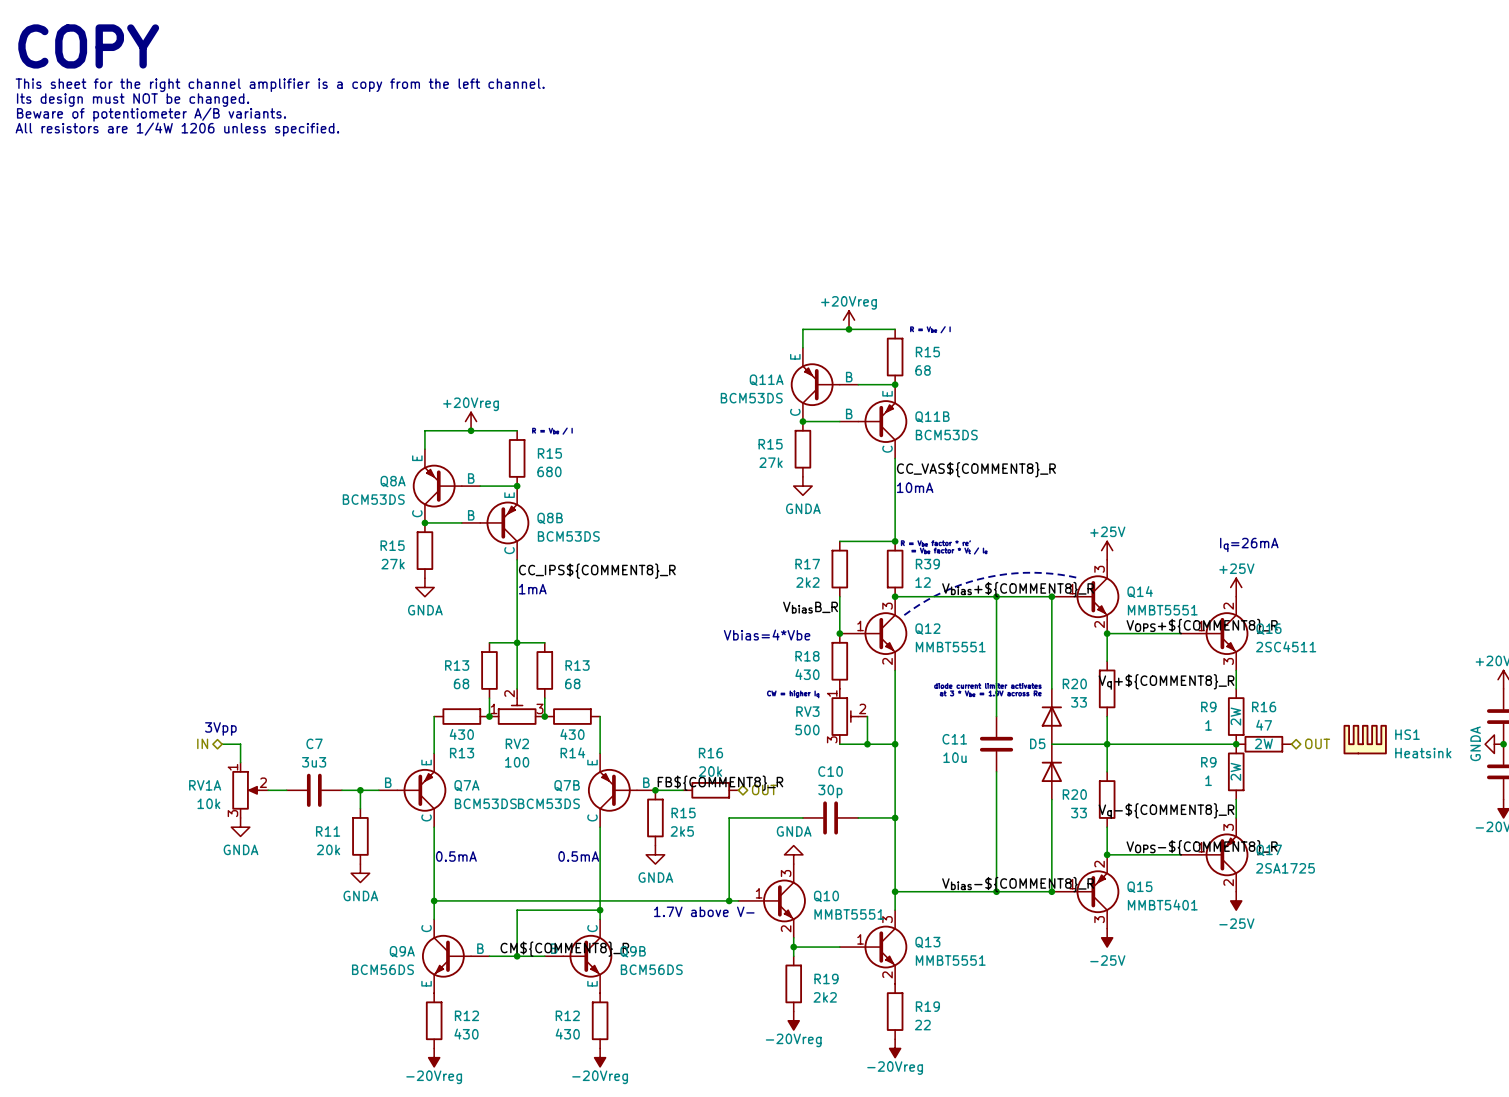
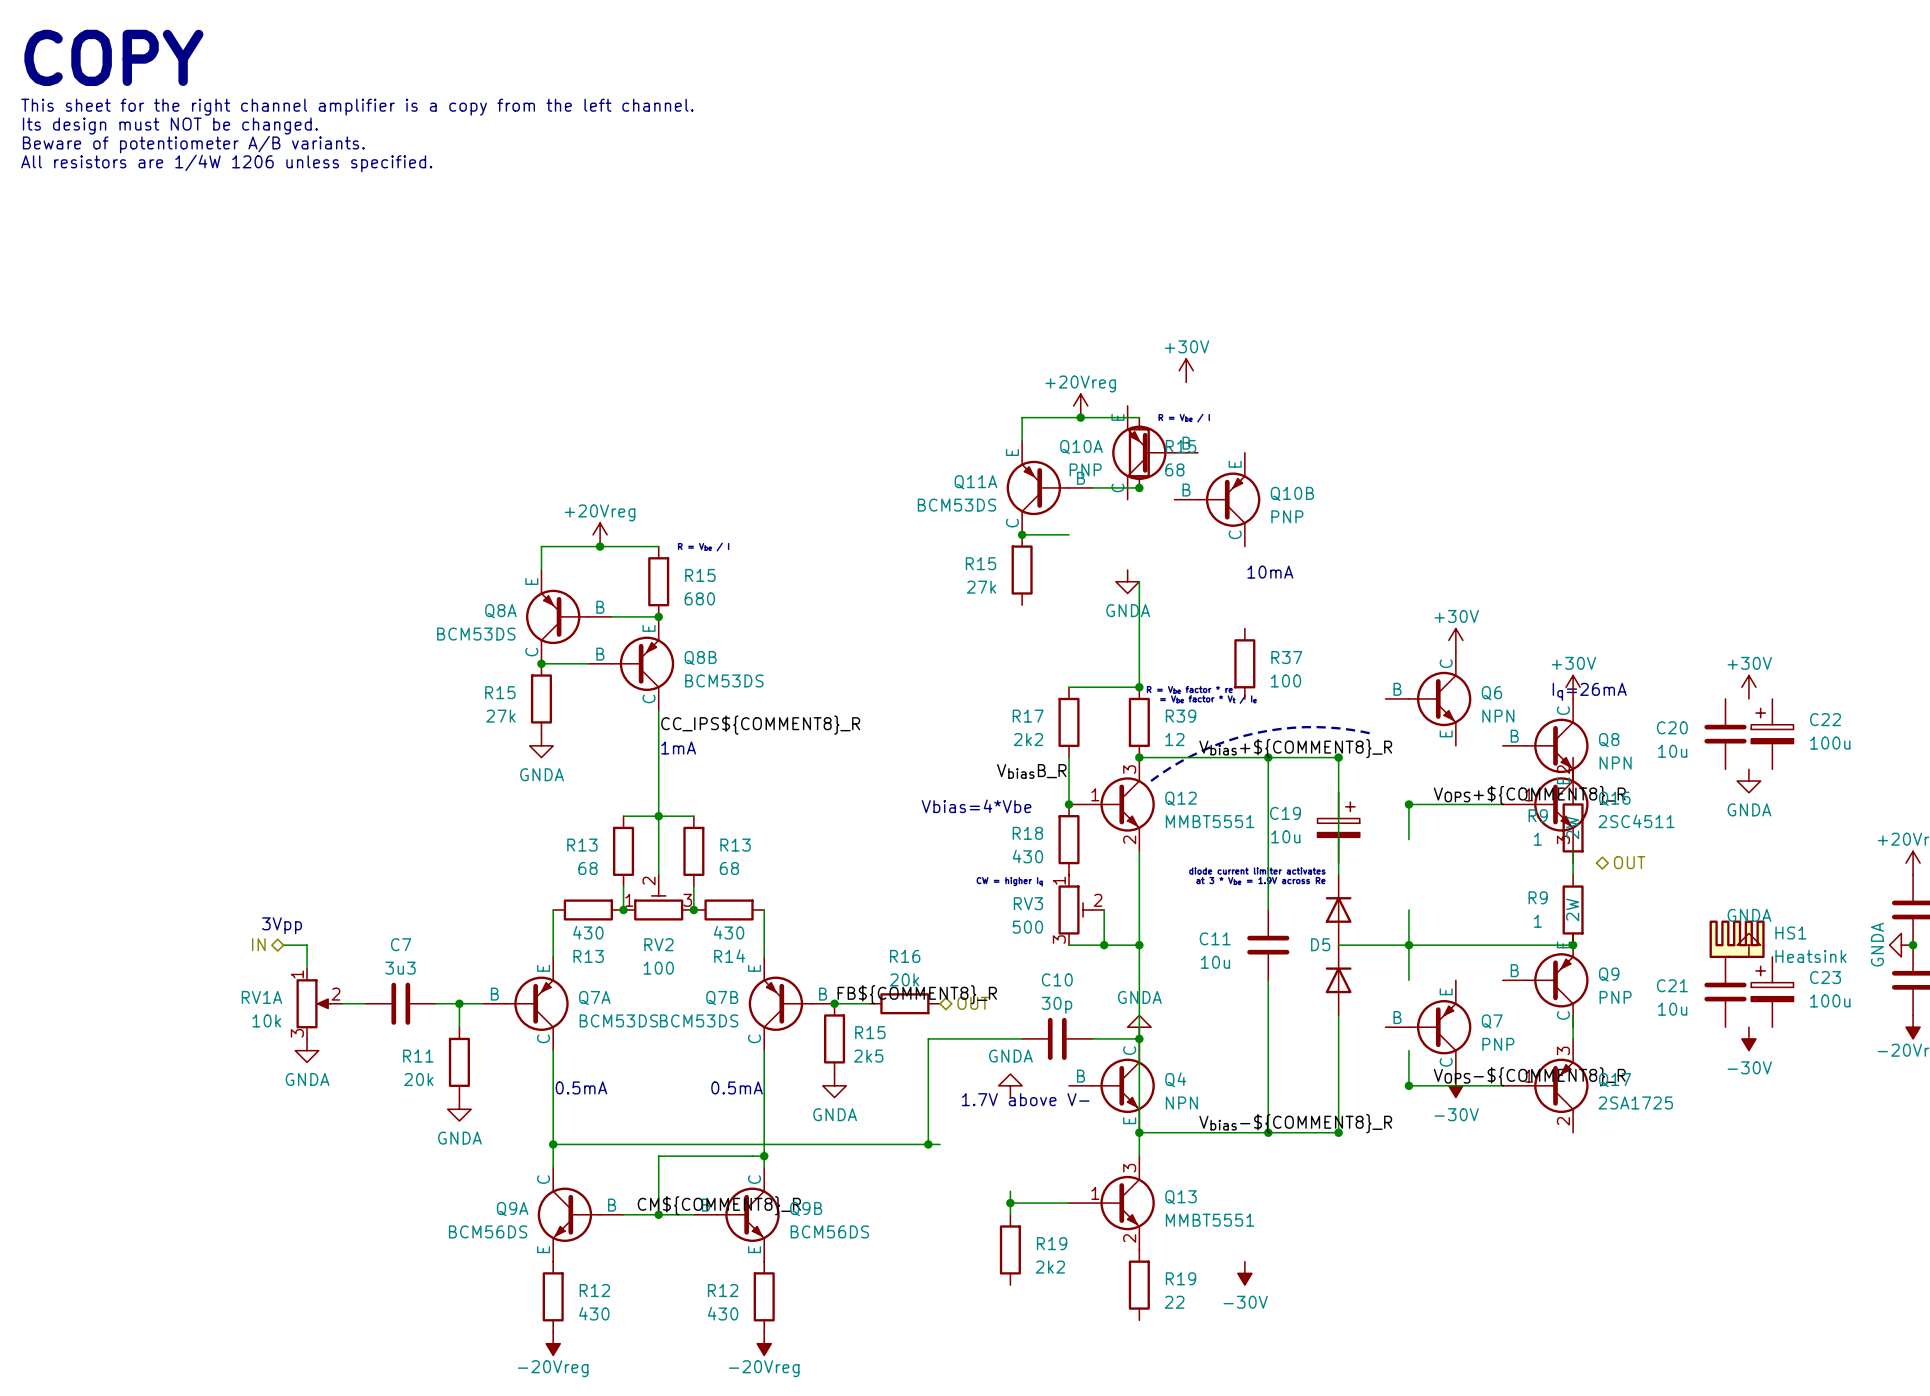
power symbol: none -> +30V (1186, 370)
Q10A: none -> PNP (1155, 452)
Q10B: none -> PNP (1217, 499)
Q11B: BCM53DS (873, 421) -> none
label: CC_VAS${COMMENT8}_R (976, 469) -> none
power symbol position: GNDA (802, 486) -> GNDA (1127, 581)
text position: 10mA (915, 487) -> 10mA (1270, 572)
power symbol: none -> +30V (1455, 640)
R37: none -> 100 (1244, 663)
power symbol: none -> +30V (1573, 687)
power symbol: none -> +30V (1748, 687)
power symbol: +25V (1107, 550) -> none
Q6: none -> NPN (1428, 698)
C20: none -> 10u (1725, 734)
C22: none -> 100u (1772, 734)
Q8: none -> NPN (1545, 745)
power symbol: +25V (1236, 587) -> none
Q14: MMBT5551 (1085, 596) -> none
power symbol: none -> GNDA (1748, 781)
C19: none -> 10u (1338, 827)
label: Vq+${COMMENT8}_R (1166, 681) -> none
R20: 33 (1107, 688) -> none
hierarchical label position: OUT (1317, 743) -> OUT (1629, 862)
R16: 47 (1263, 744) -> none
power symbol: none -> GNDA (1748, 945)
Q9: none -> PNP (1545, 980)
R9 position: (1236, 771) -> (1573, 827)
C21: none -> 10u (1725, 992)
C23: none -> 100u (1772, 992)
R20: 33 (1107, 799) -> none
power symbol: none -> GNDA (1139, 1027)
Q7: none -> PNP (1428, 1027)
label: Vq-${COMMENT8}_R (1166, 811) -> none
power symbol: none -> -30V (1748, 1038)
Q4: none -> NPN (1111, 1085)
power symbol: none -> -30V (1455, 1085)
Q15: MMBT5401 (1085, 891) -> none
Q10: MMBT5551 (772, 900) -> none
power symbol: -25V (1236, 900) -> none
text position: 1.7V above V- (704, 911) -> 1.7V above V- (1025, 1099)
power symbol: -25V (1107, 937) -> none
power symbol: none -> -30V (1244, 1273)
power symbol: -20Vreg (793, 1020) -> none
power symbol: -20Vreg (895, 1048) -> none

